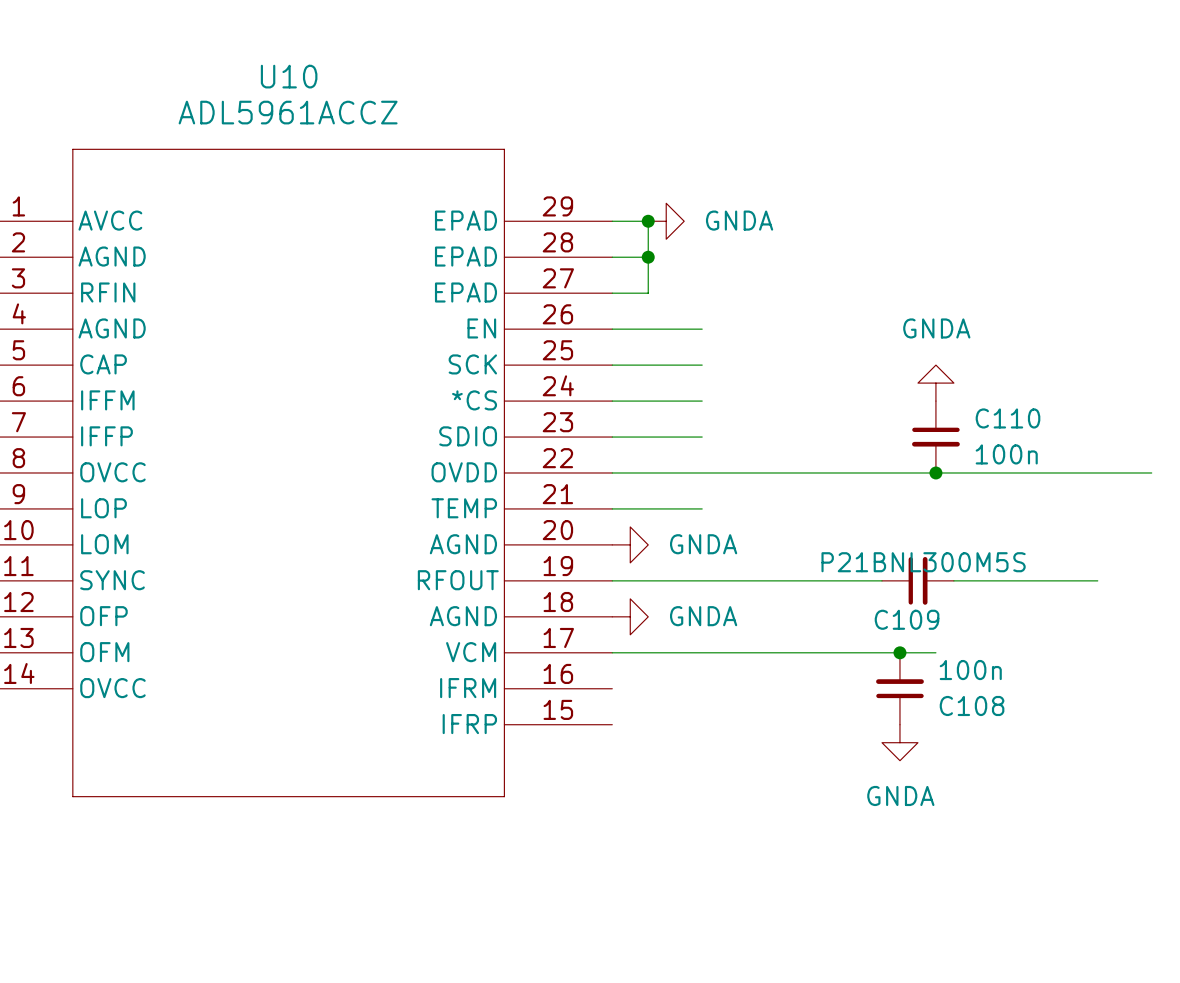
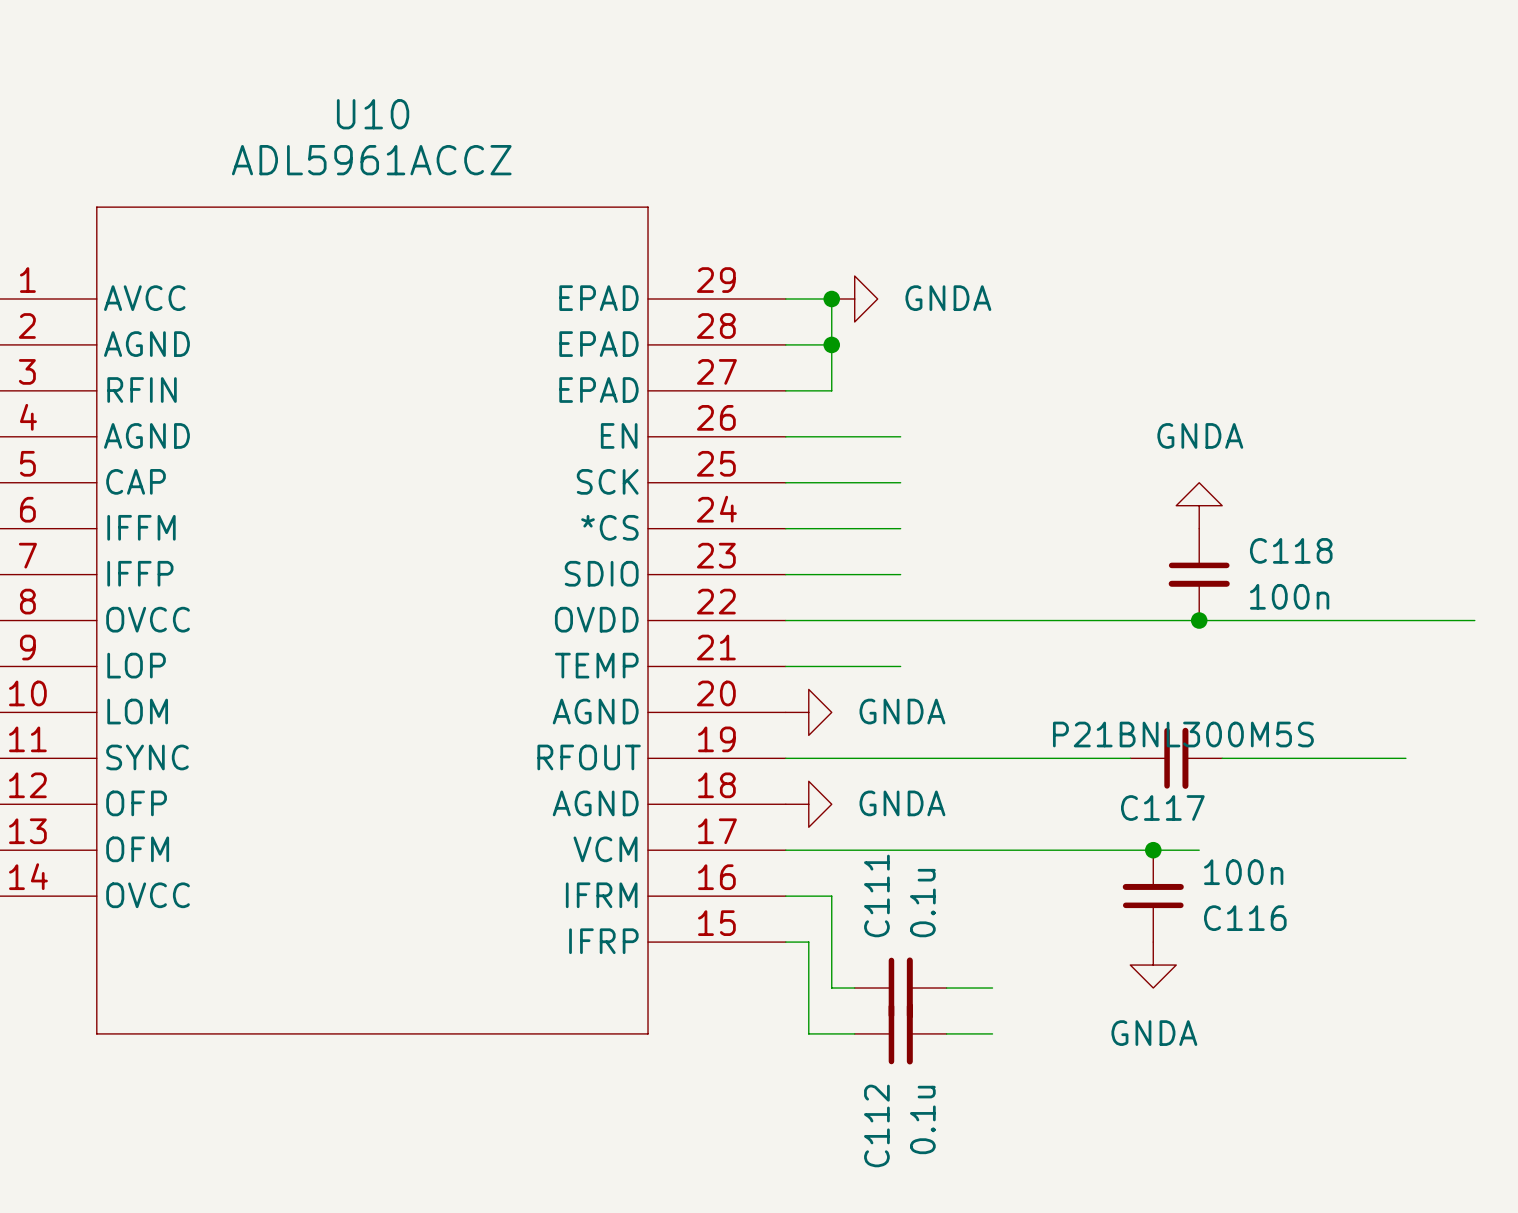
C110 name: C110 (1008, 418) -> C118 (1291, 550)
C109 name: C109 (907, 619) -> C117 (1162, 808)
wire: none -> (785, 896) (831, 896) (831, 988) (854, 988)
C108 name: C108 (972, 705) -> C116 (1245, 918)
wire: none -> (785, 942) (808, 942) (808, 1033) (854, 1033)
C111: none -> 0.1u (900, 988)
wire: none -> (946, 988) (992, 988)
C112: none -> 0.1u (900, 1033)
wire: none -> (946, 1033) (992, 1033)

